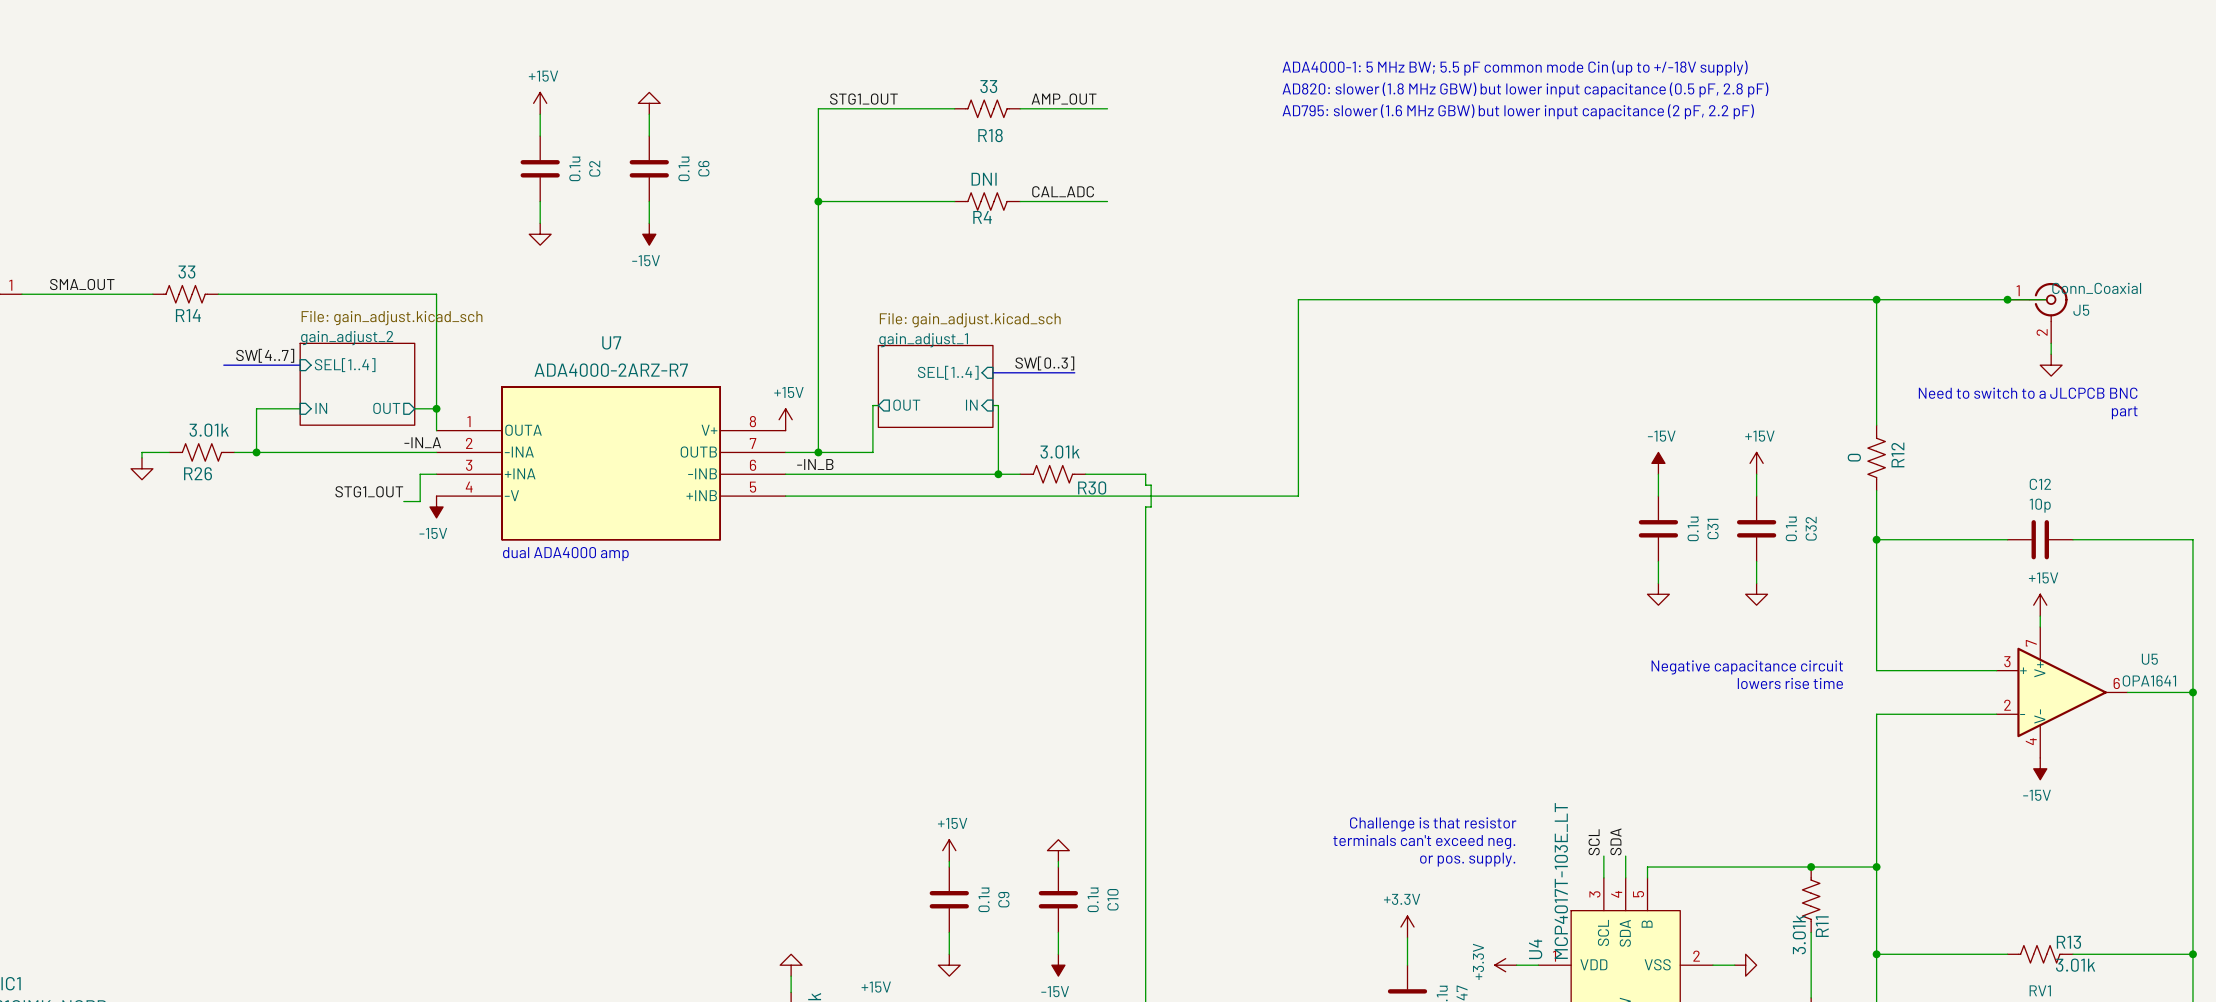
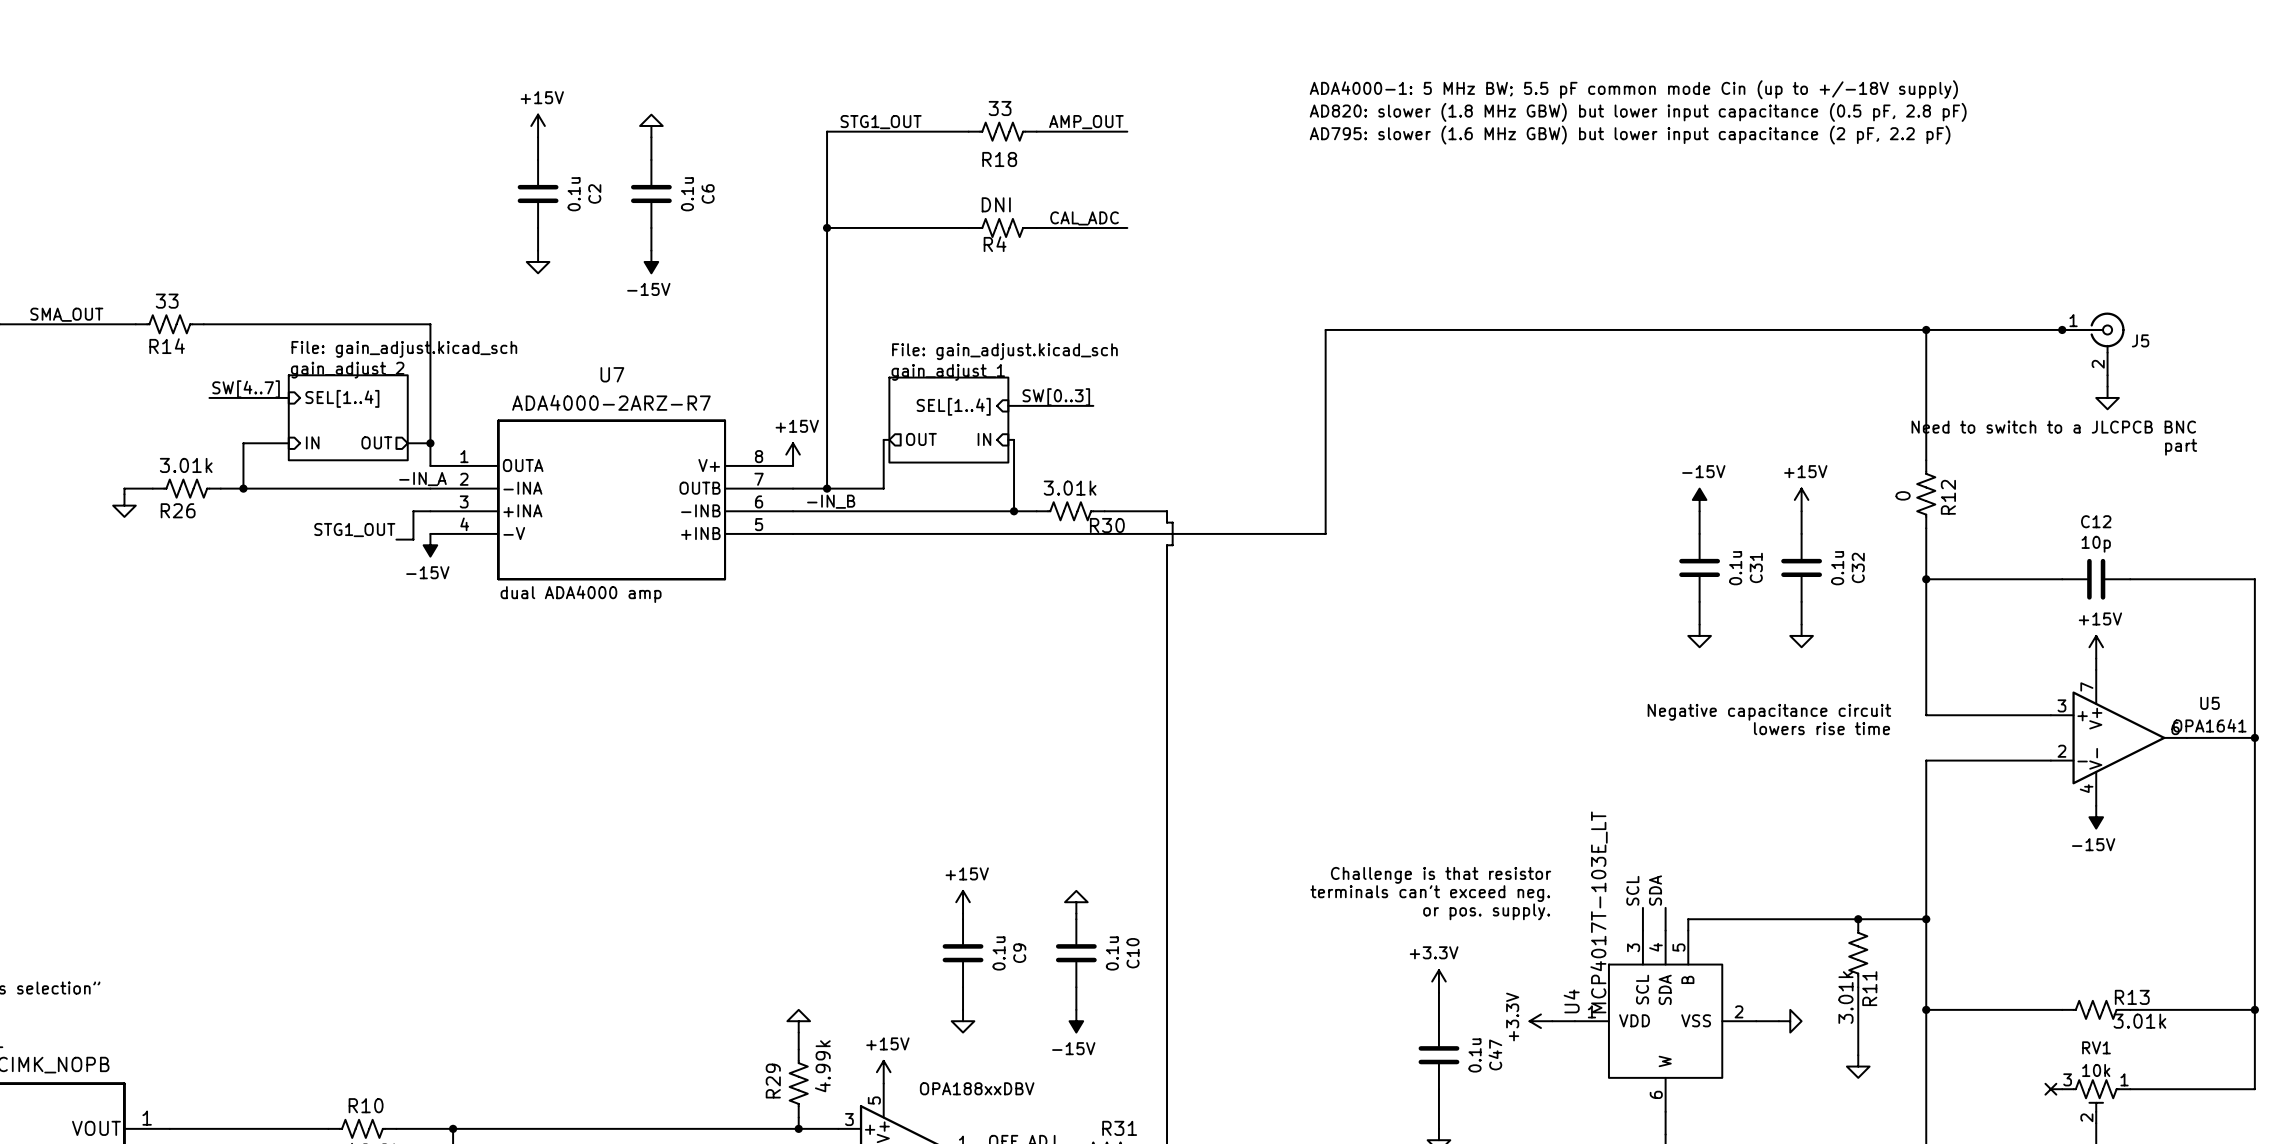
J5 value: Conn_Coaxial (2096, 288) -> none

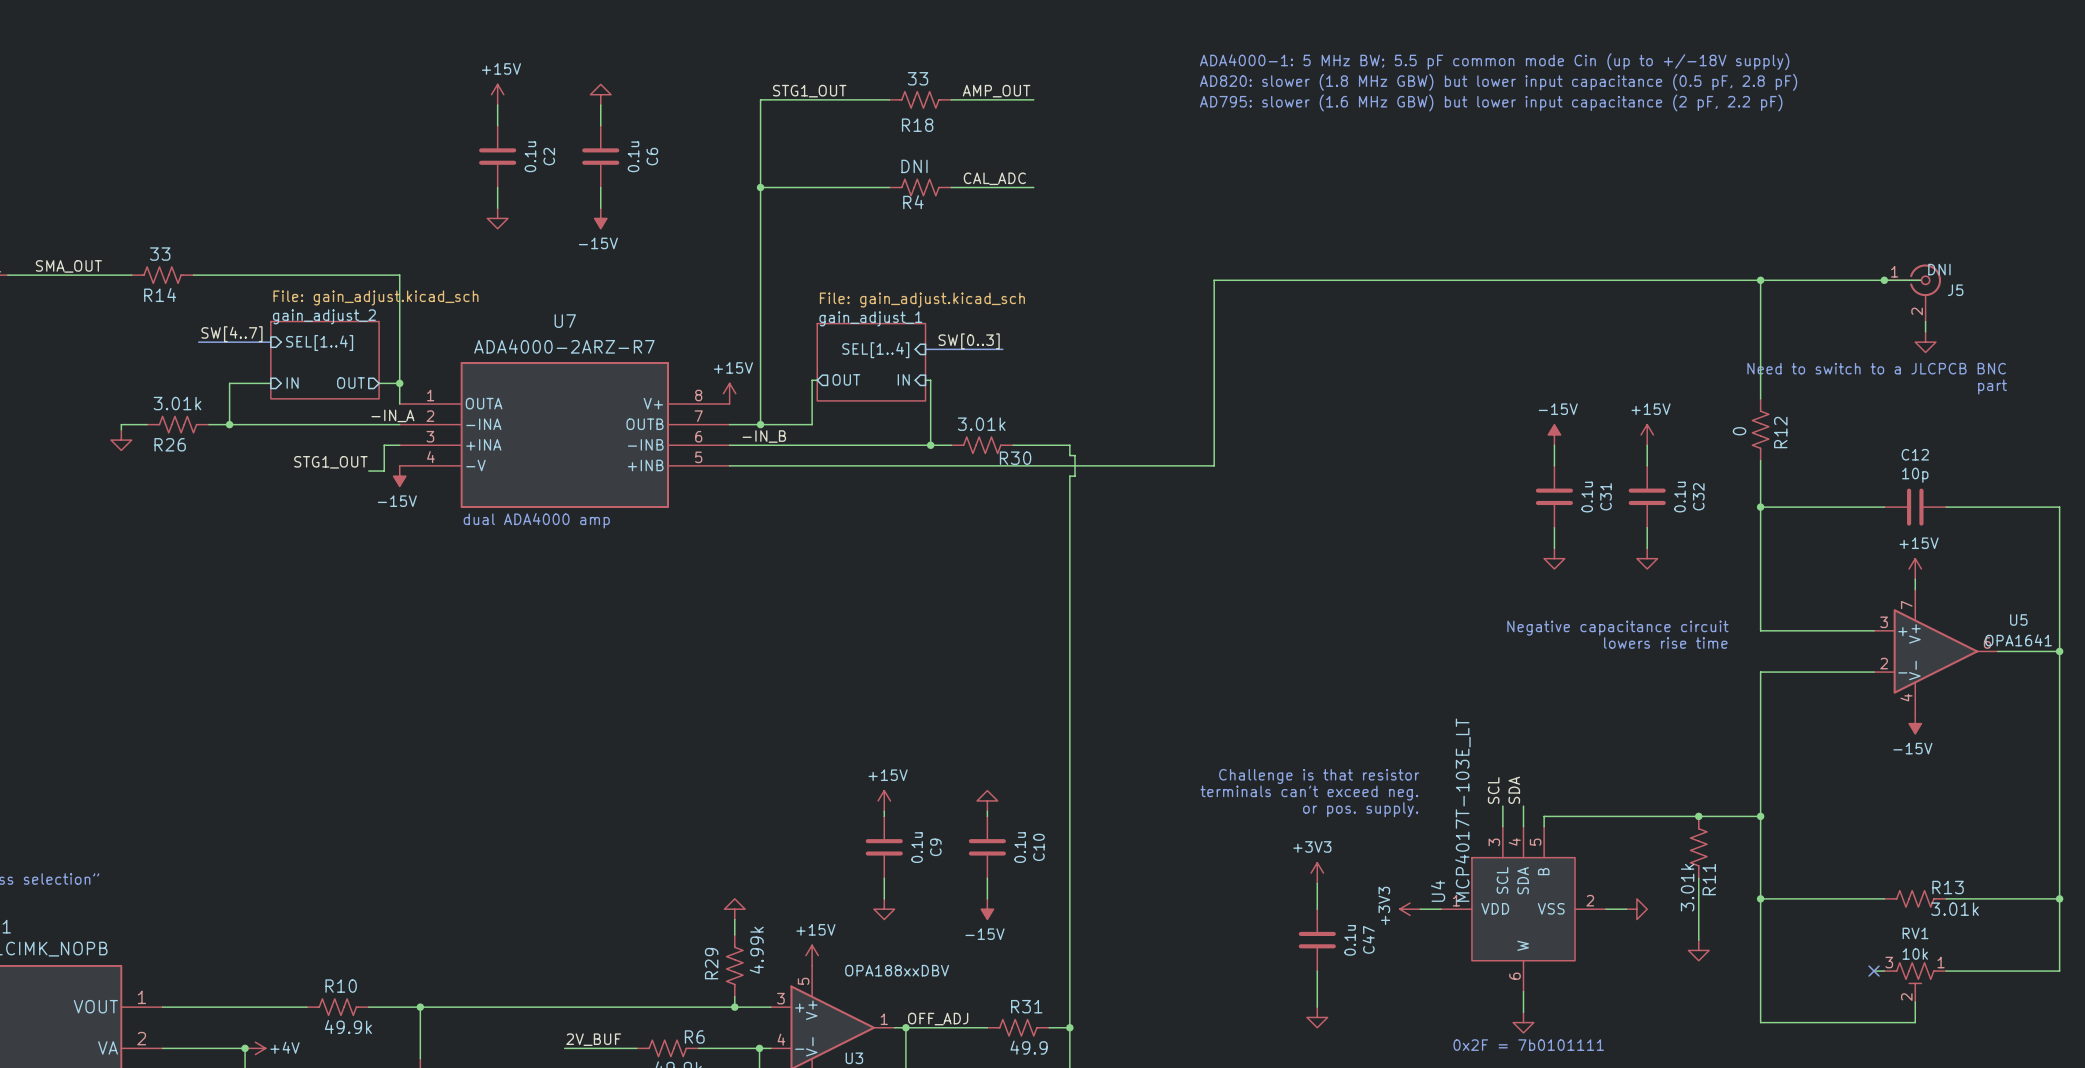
J5 value: none -> DNI (1939, 269)
power symbol: +3.3V (1438, 981) -> +3V3 (1317, 873)
power symbol: +3.3V (1540, 1021) -> +3V3 (1410, 909)

